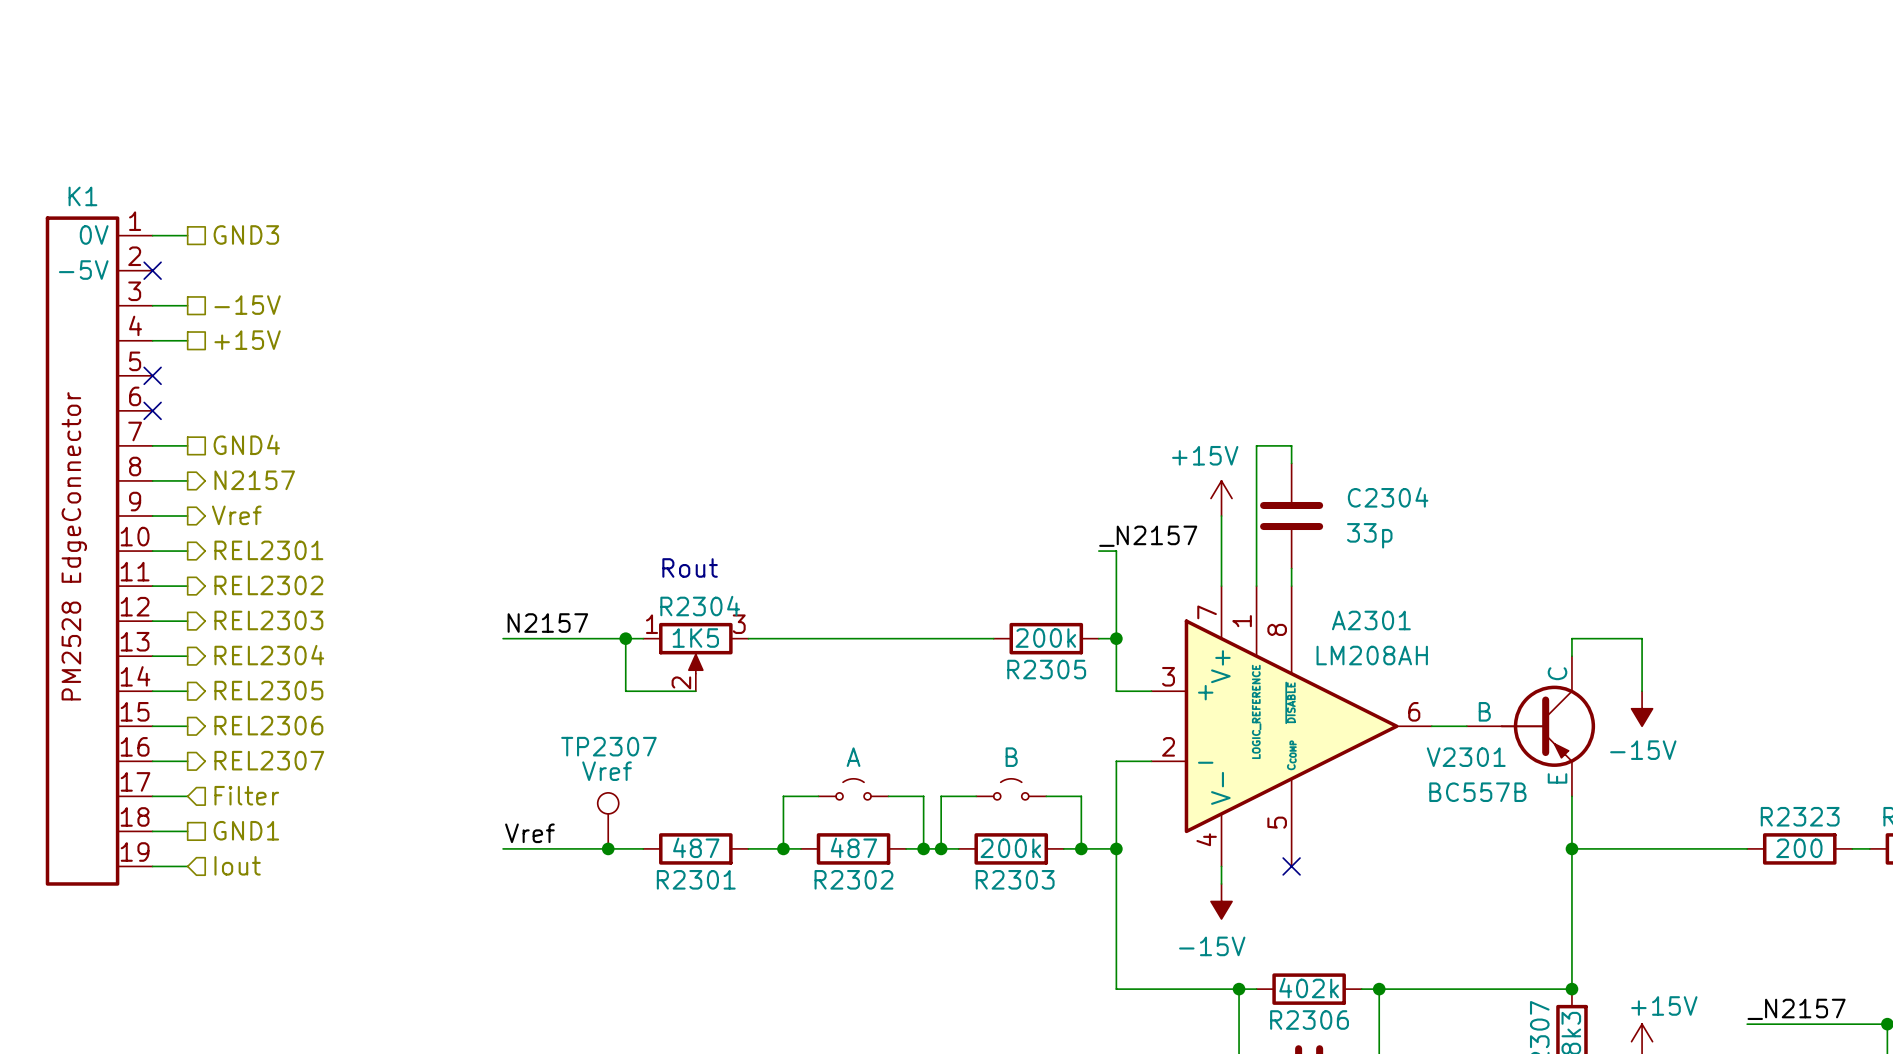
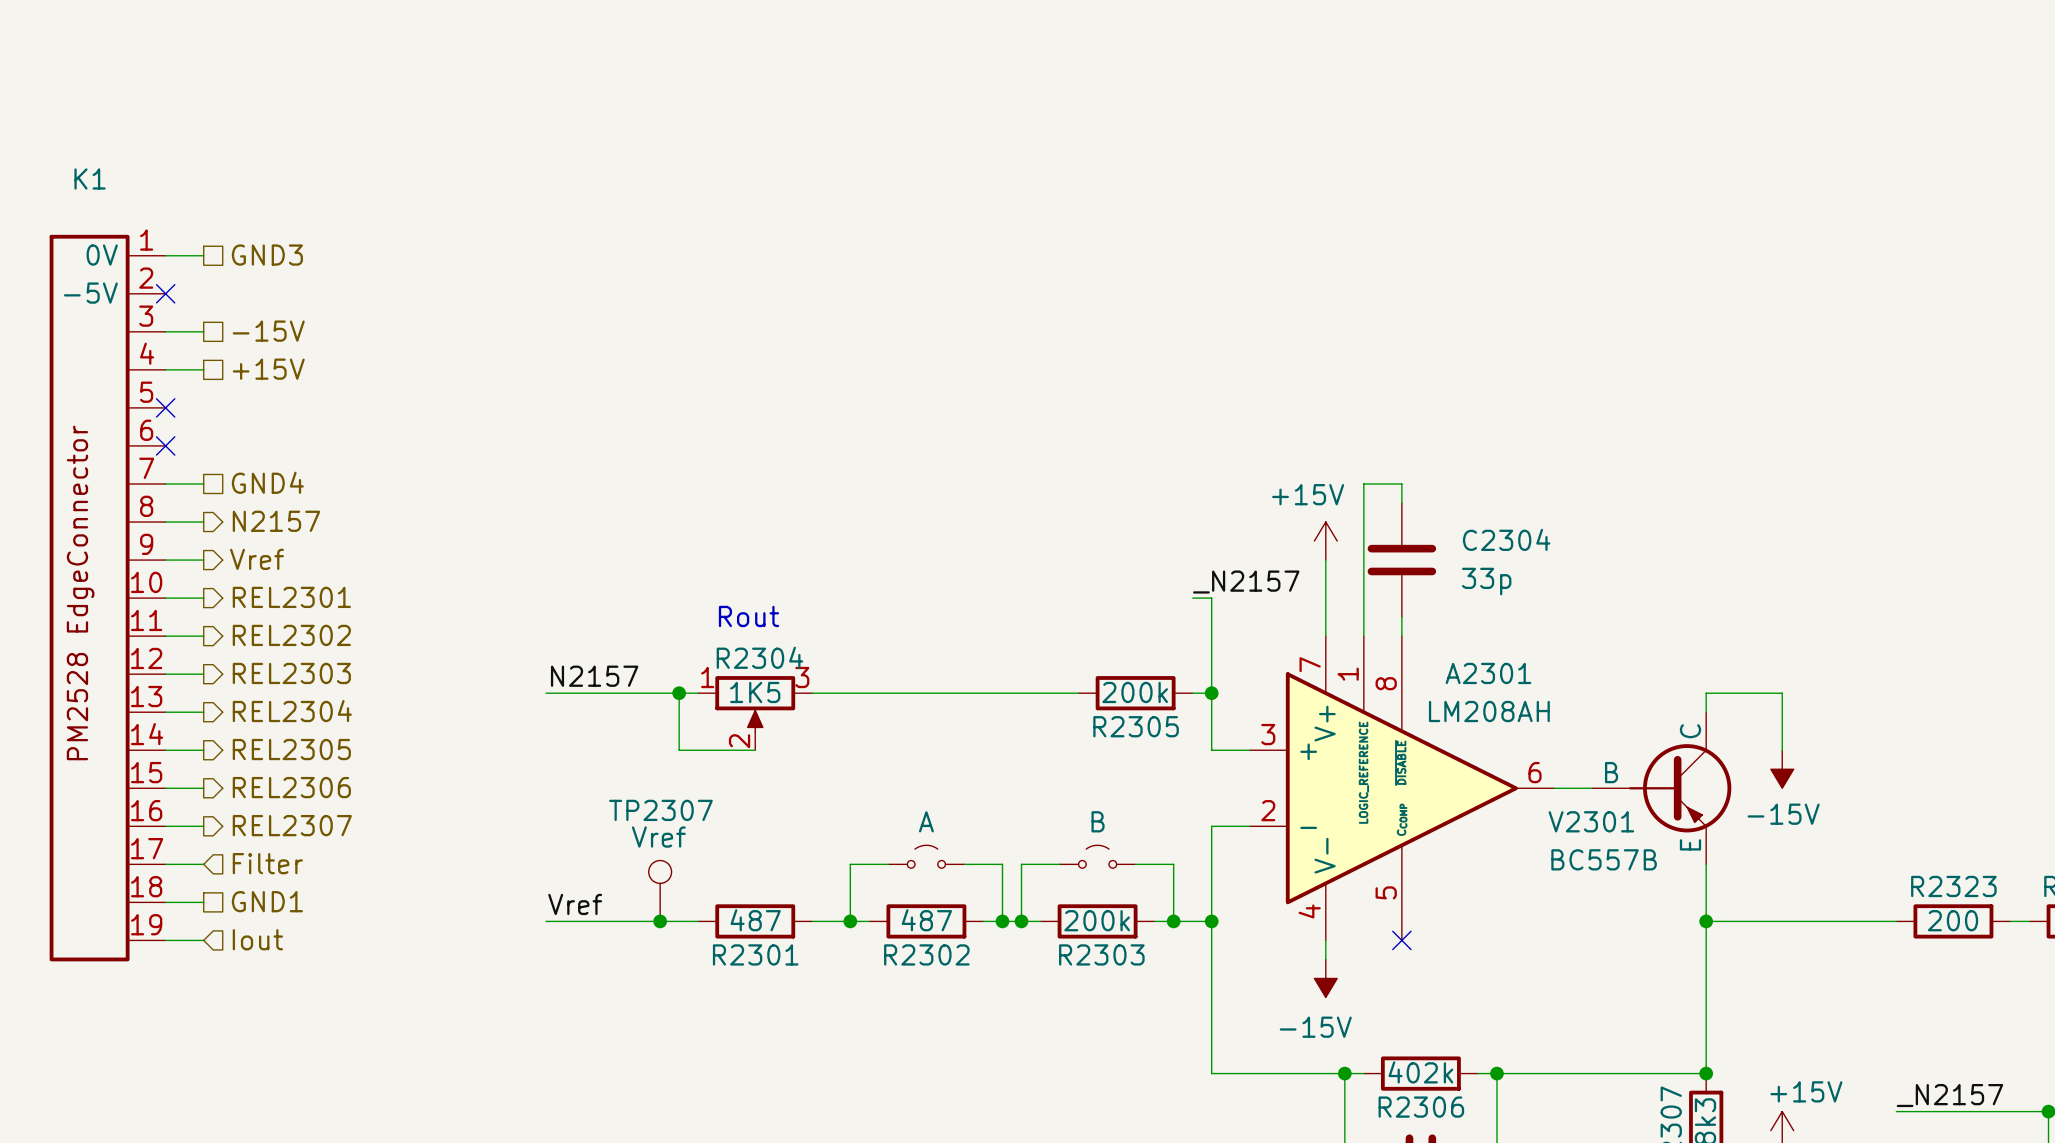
K1 name position: K1 (82, 196) -> K1 (90, 178)

